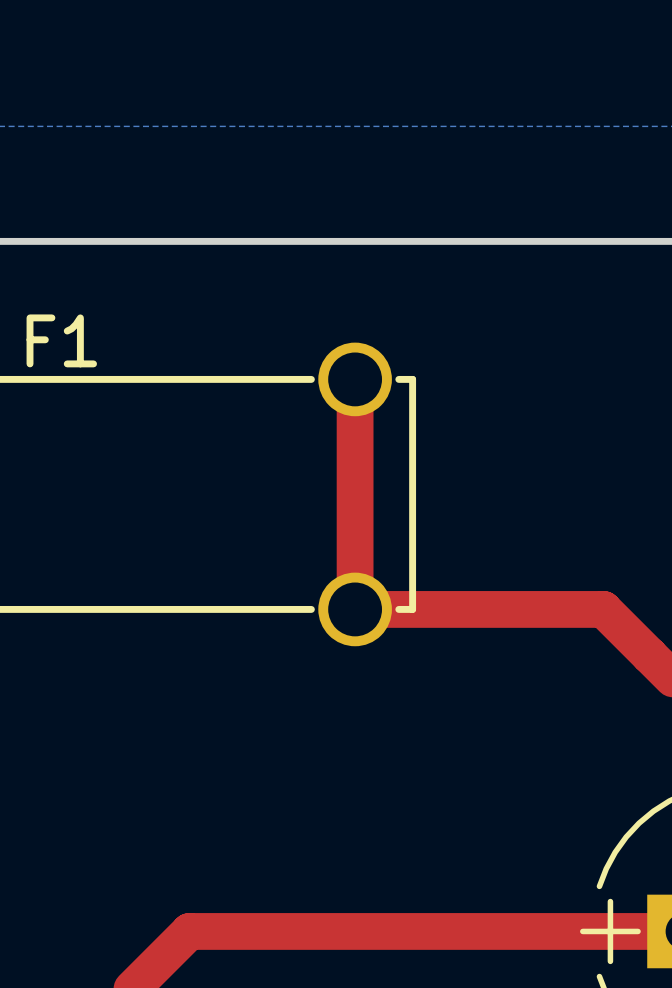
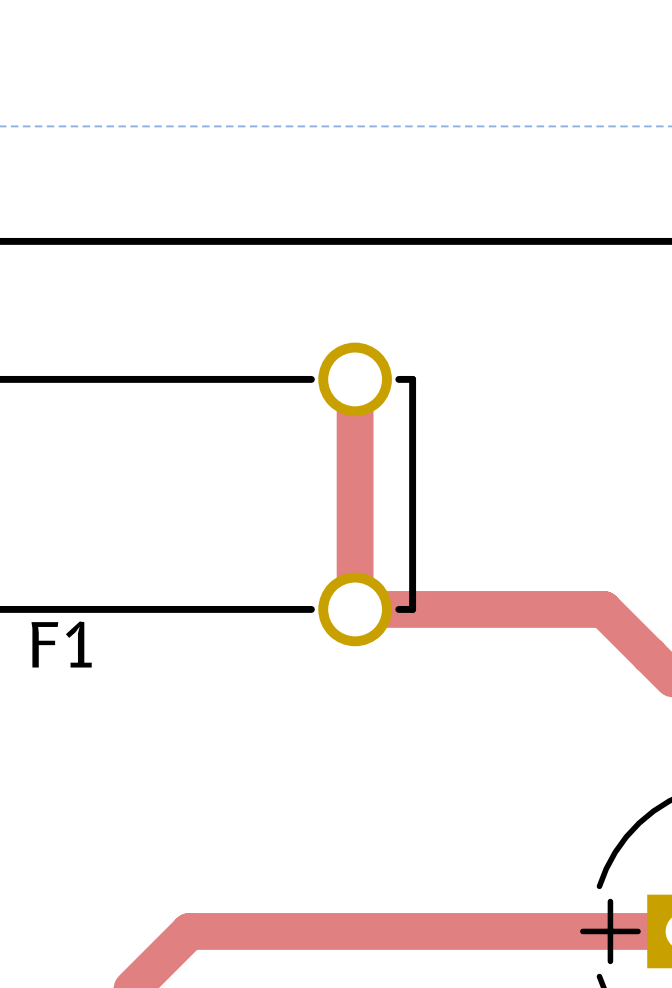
F1 name position: F1 (61, 340) -> F1 (61, 644)

